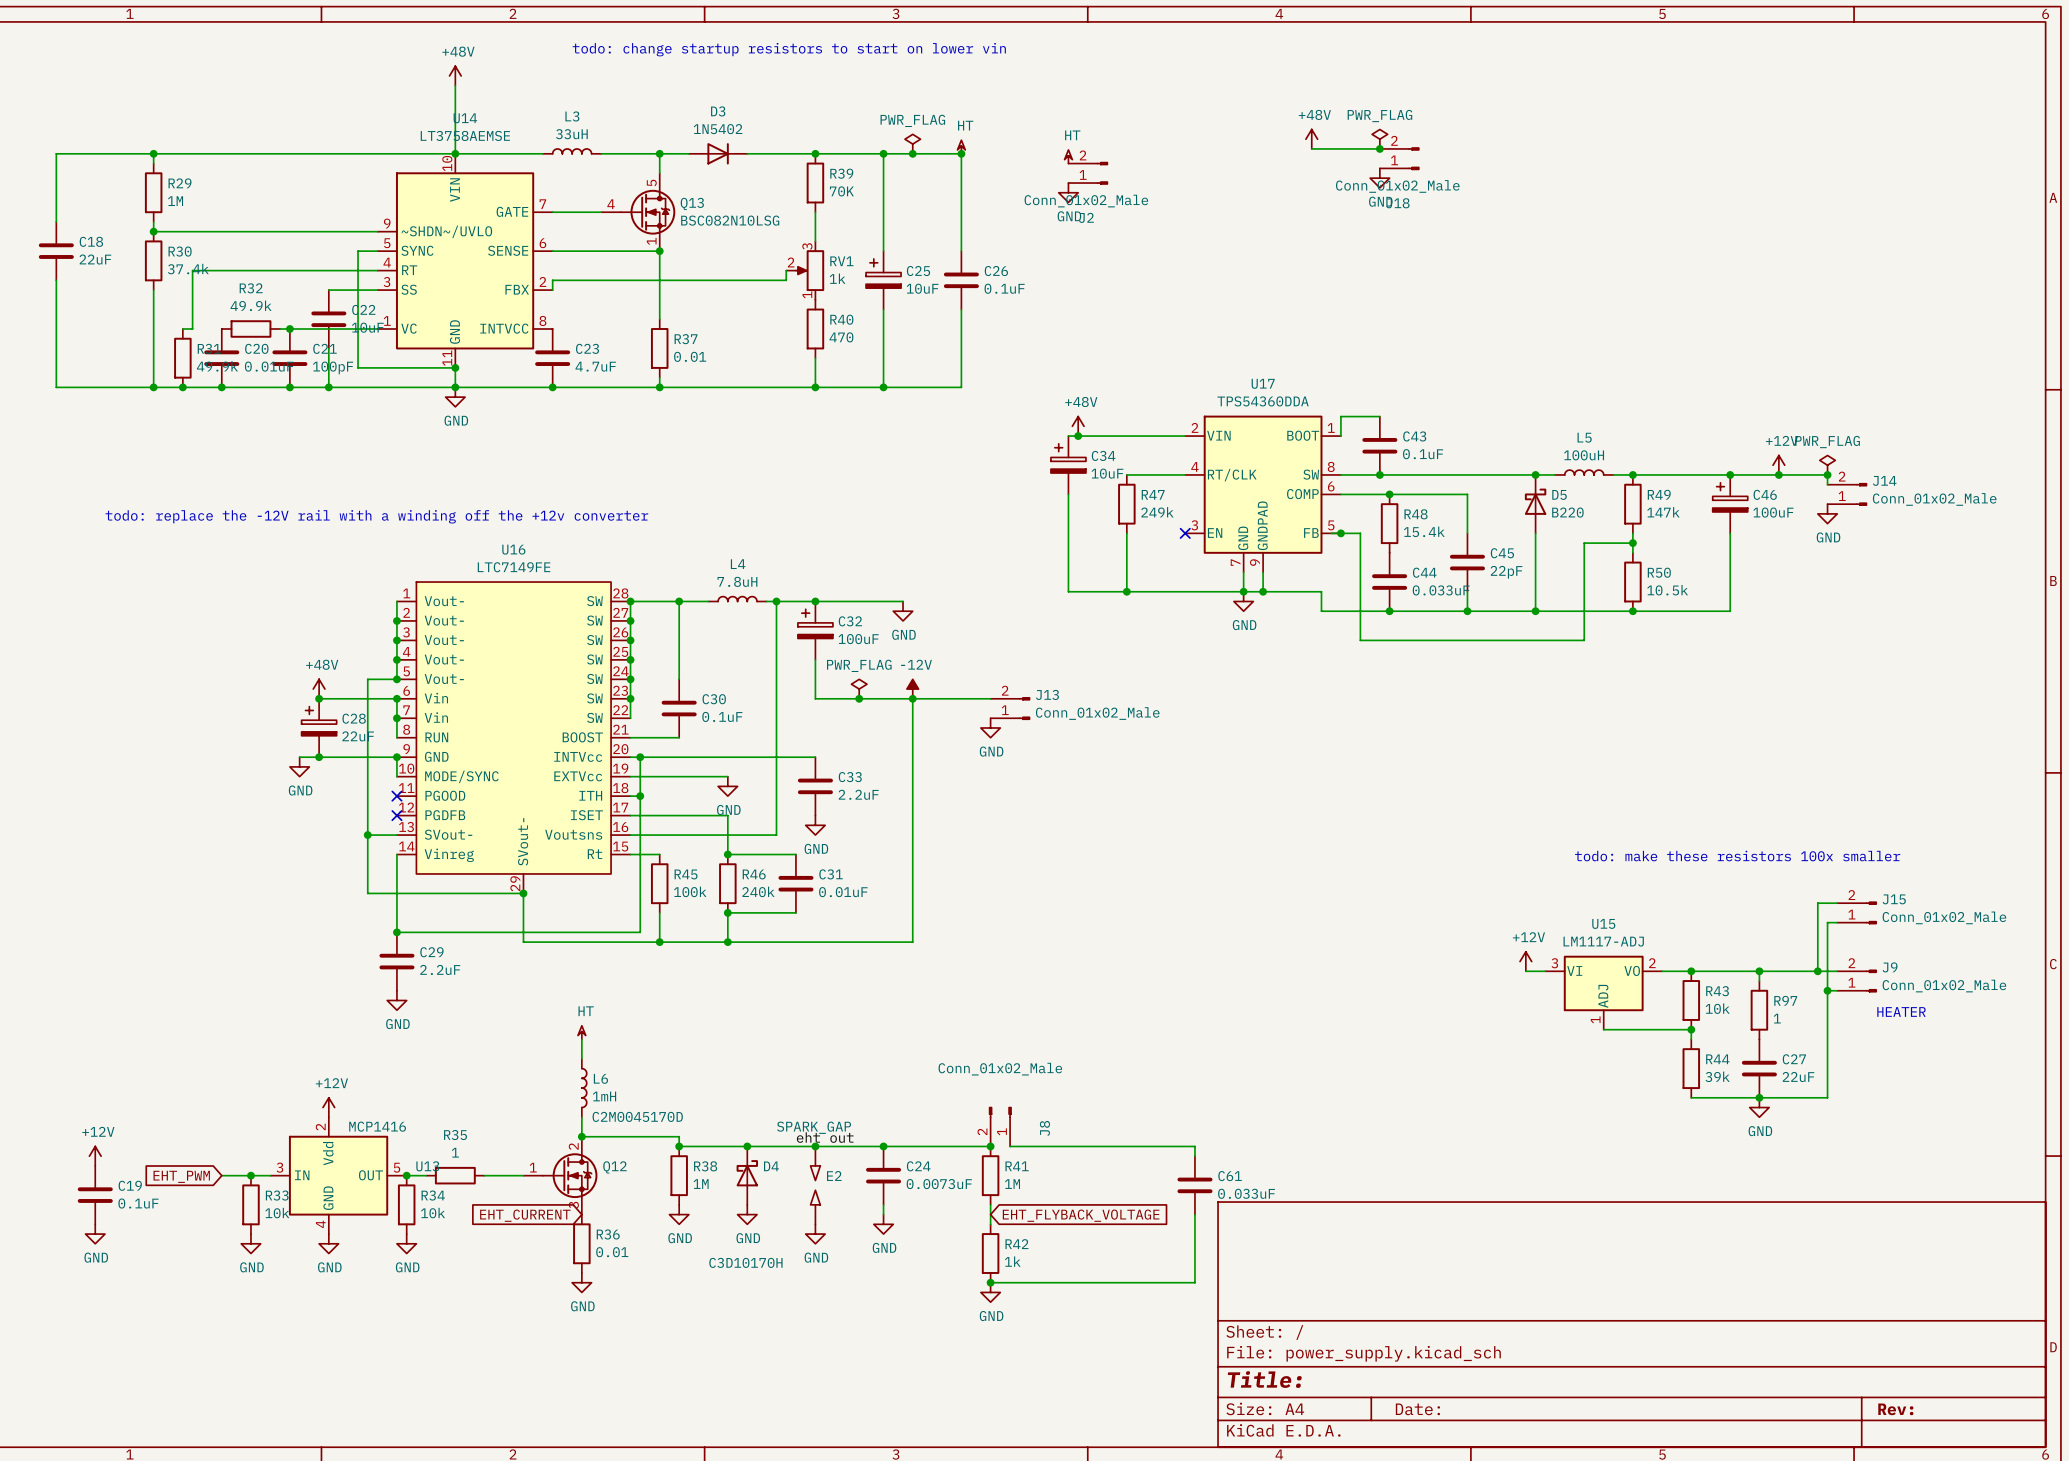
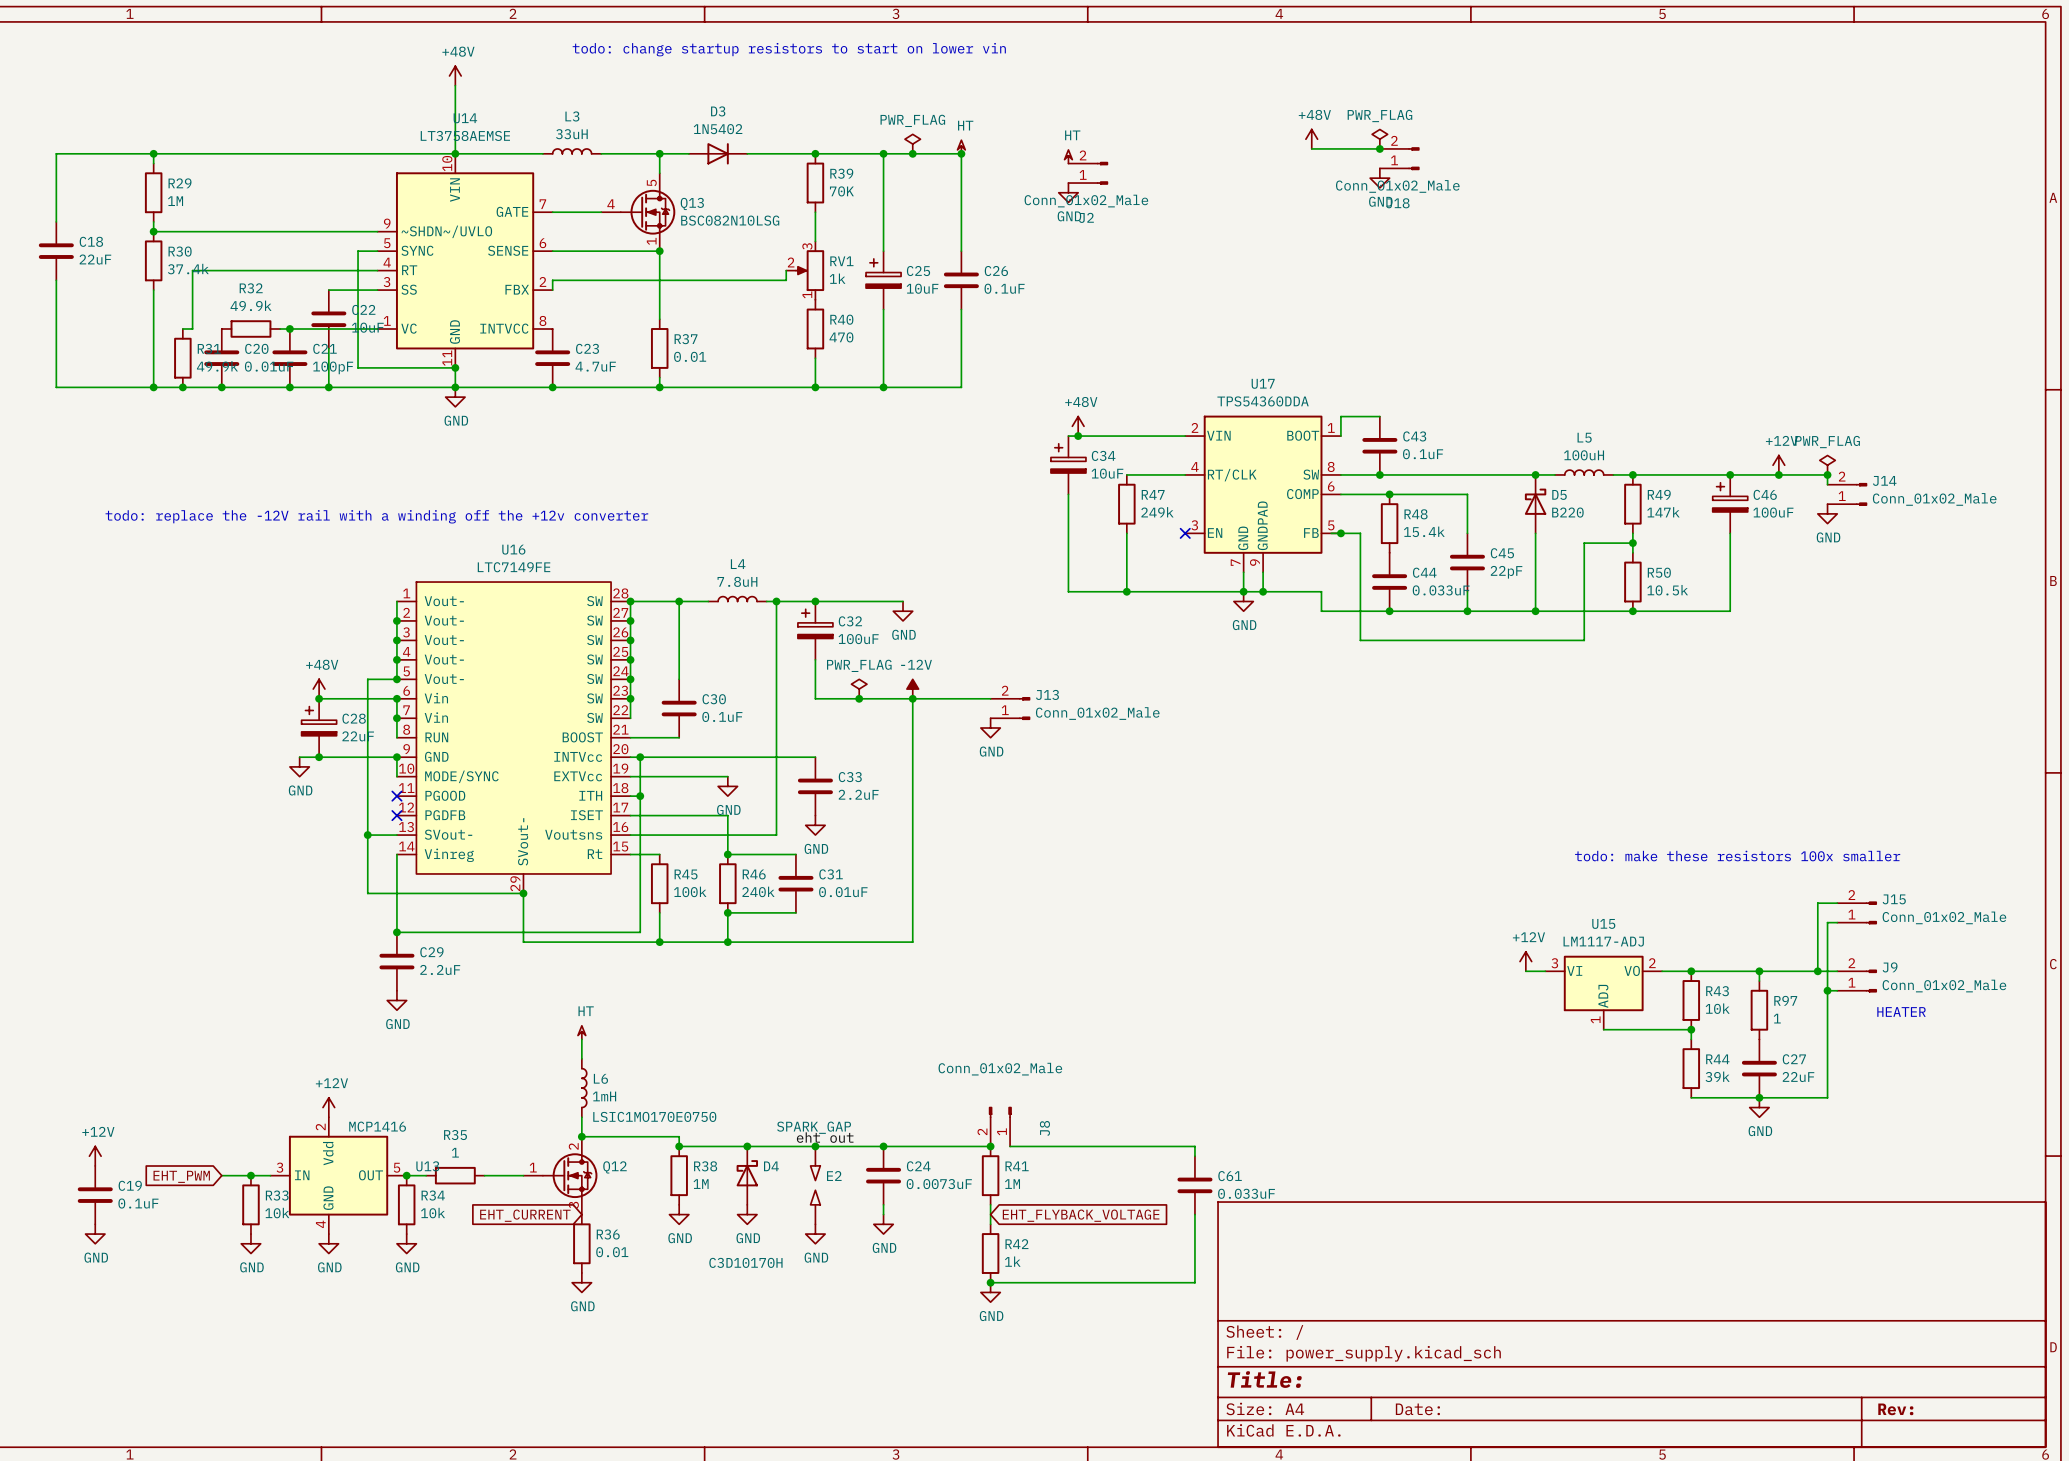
Q12 value: C2M0045170D (637, 1116) -> LSIC1MO170E0750 (654, 1116)

